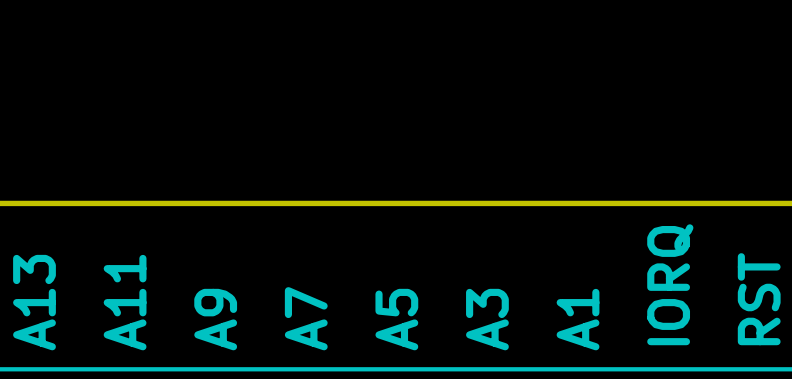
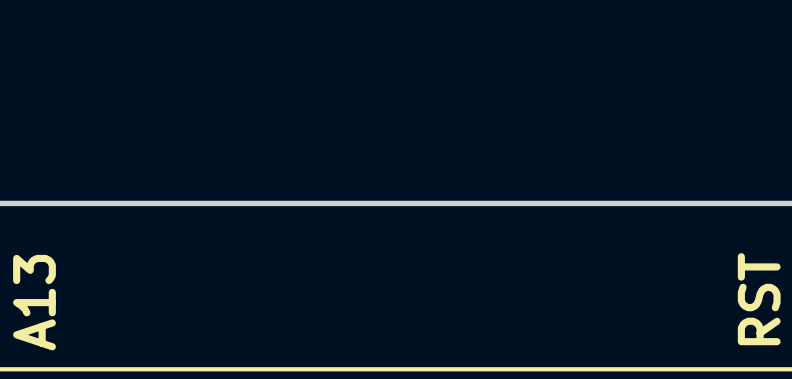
text: IORQ (670, 284) -> none
text: A11 (125, 302) -> none
text: A7 (306, 318) -> none
text: A9 (215, 319) -> none
text: A5 (396, 319) -> none
text: A3 (487, 319) -> none
text: A1 (578, 319) -> none

